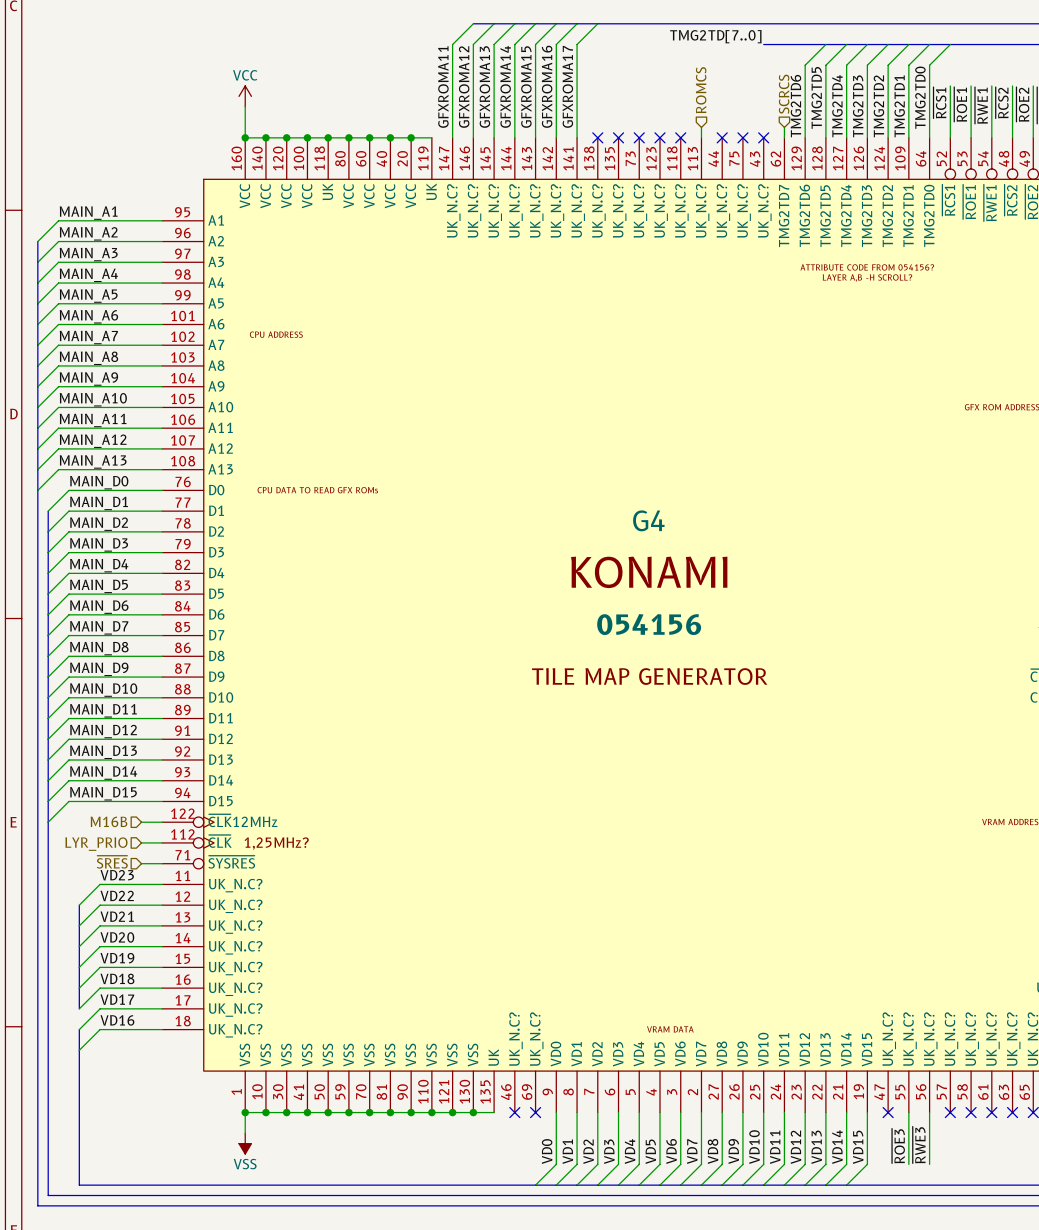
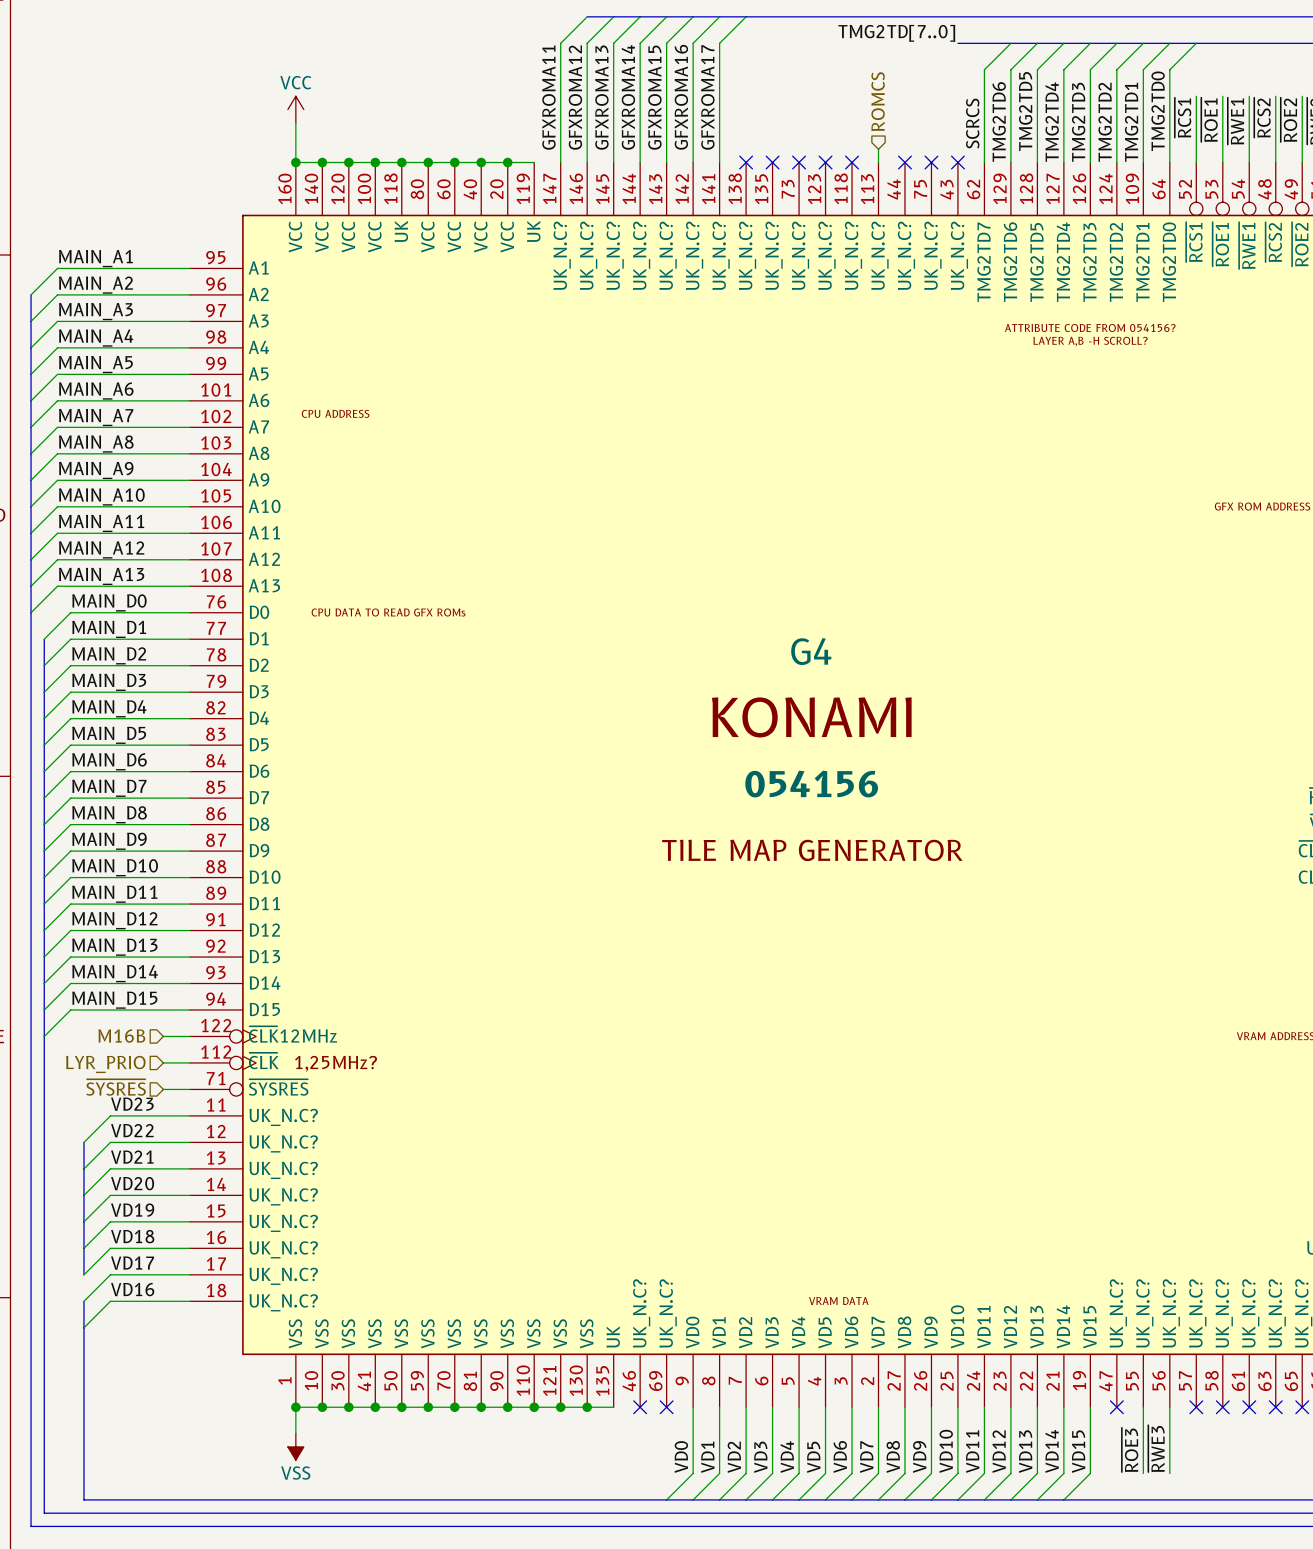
wire: none -> (1010, 43) (984, 69) (984, 149)
hierarchical label: SCRCS (784, 94) -> none
label: none -> SCRCS (972, 123)
hierarchical label: ~{SRES} (112, 862) -> ~{SYSRES} (116, 1087)

